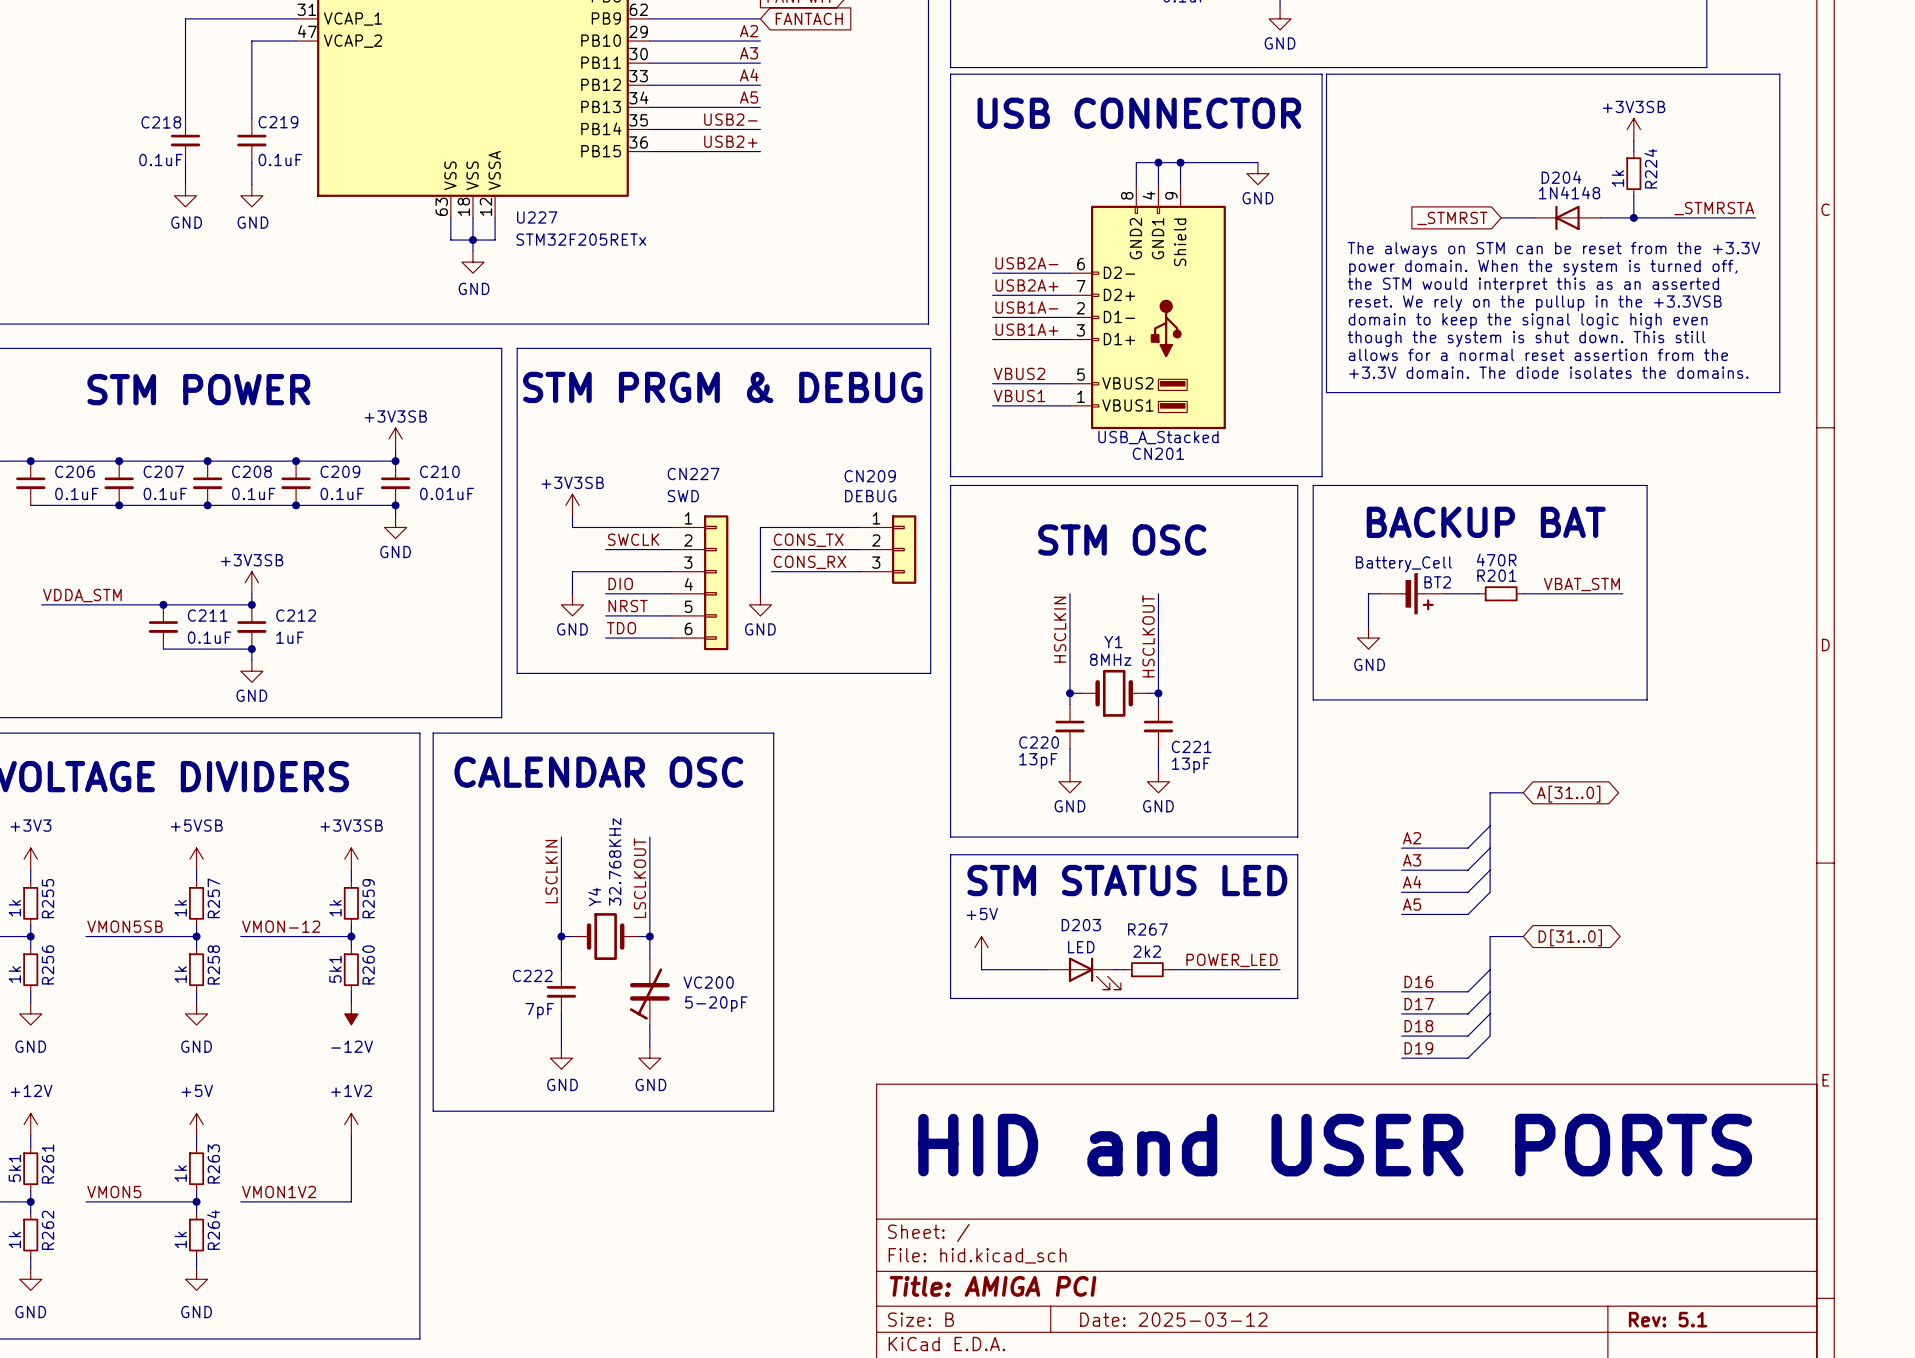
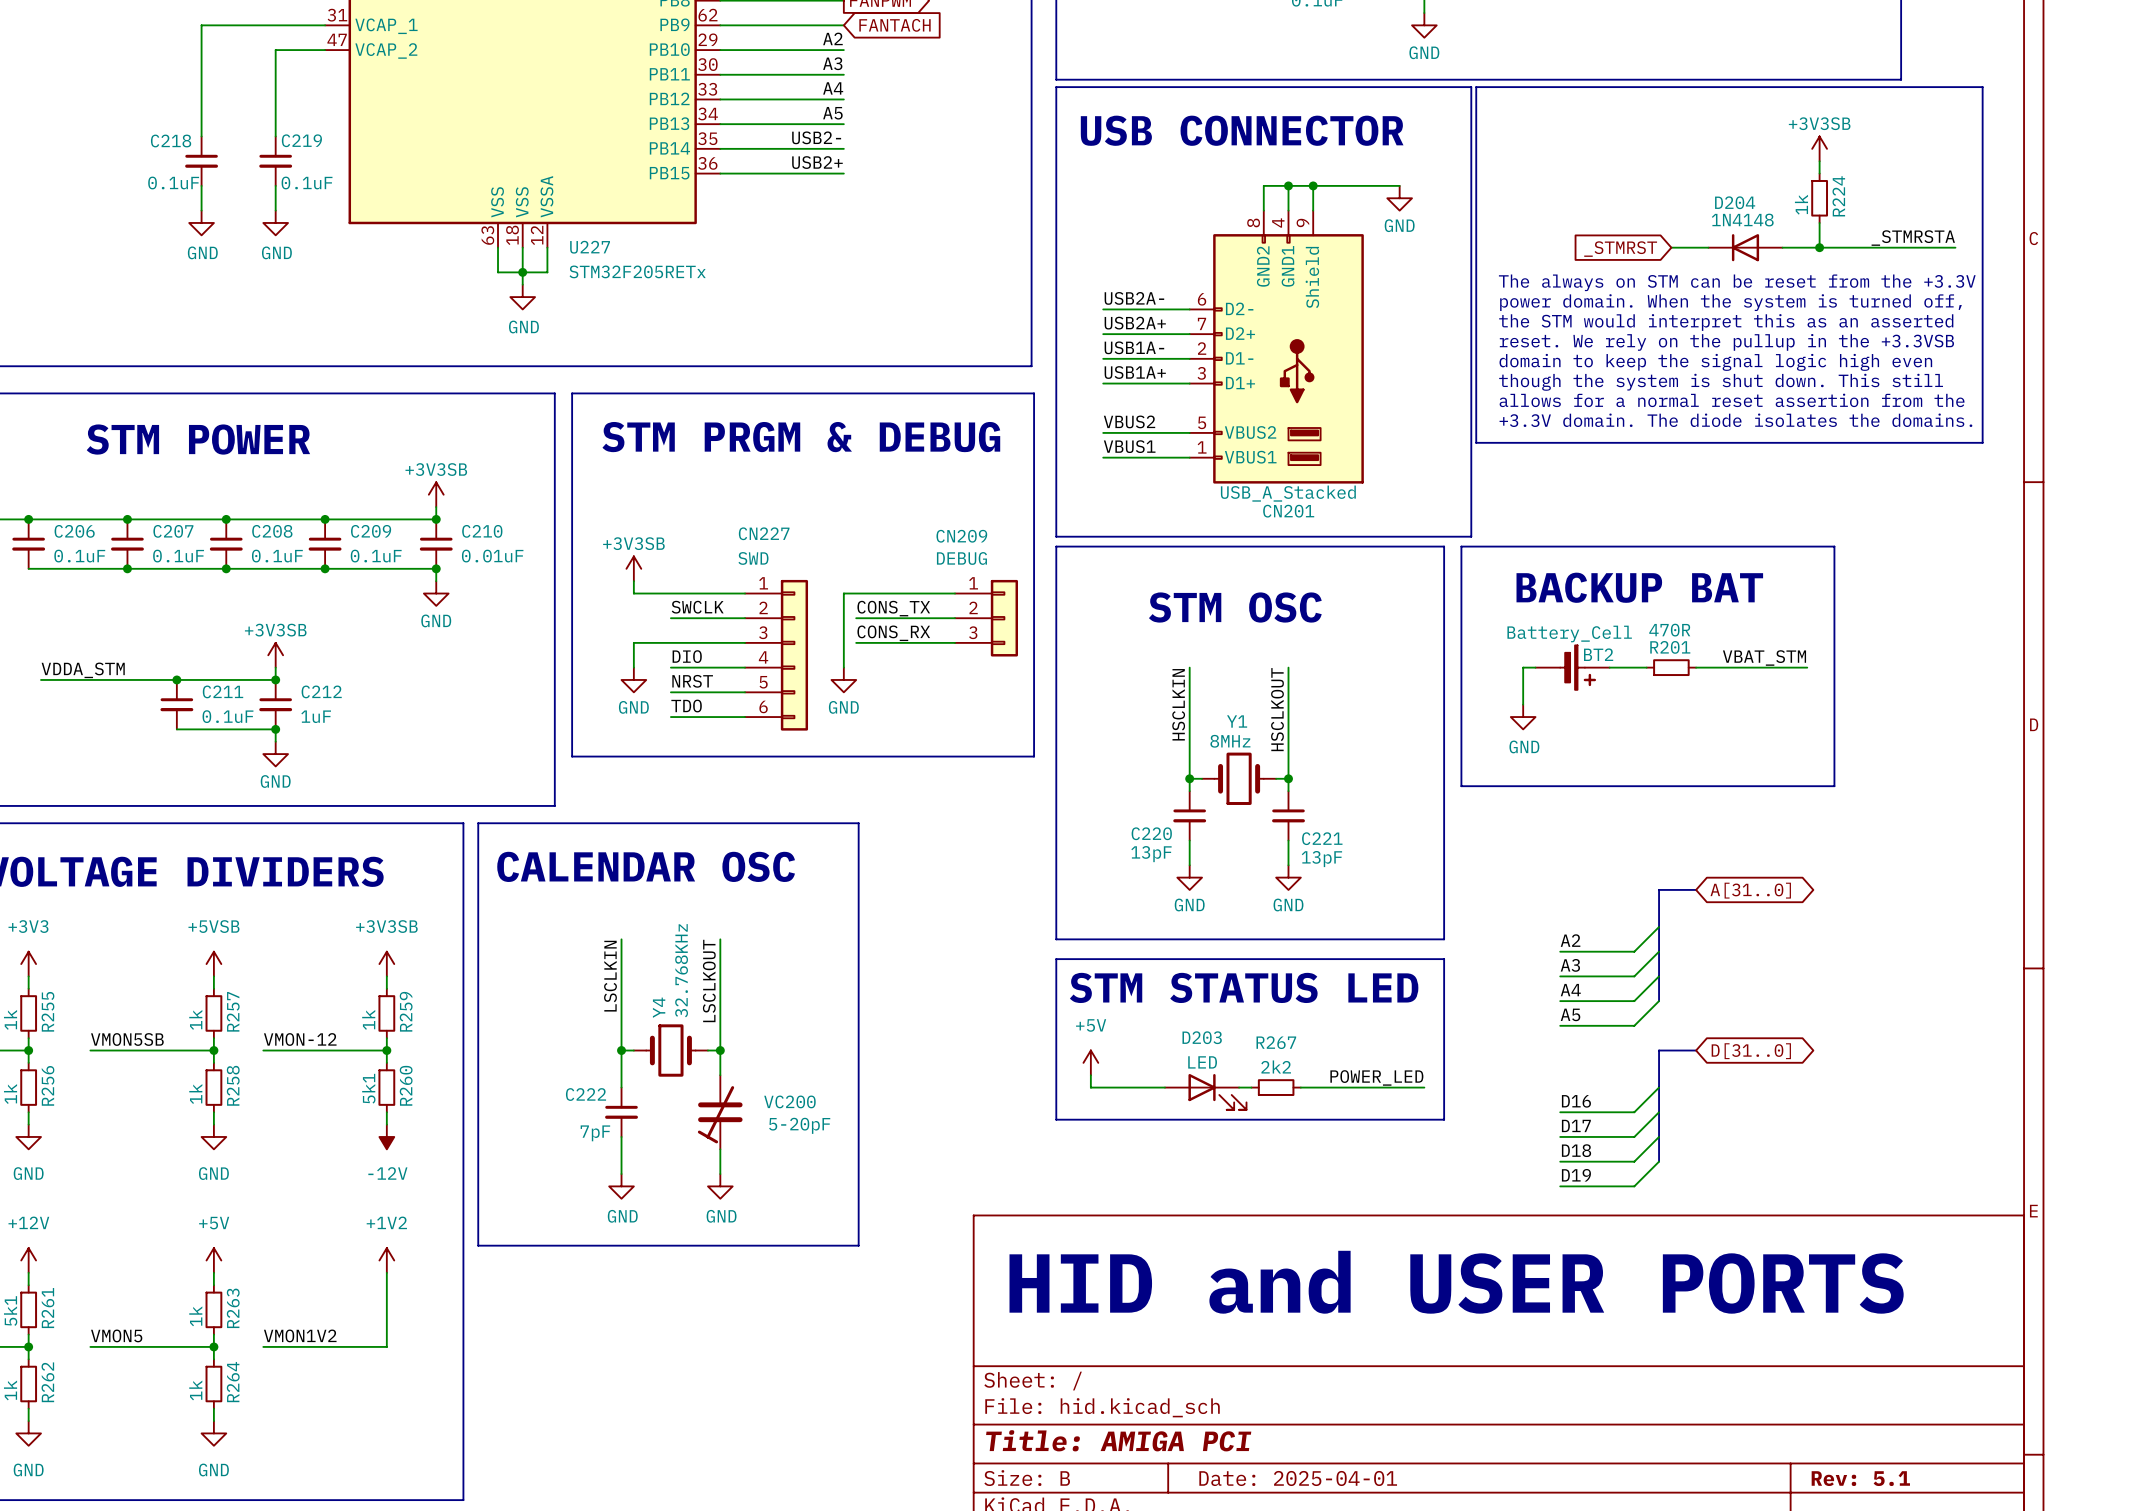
title block: Date: 2025-03-12 (1173, 1319) -> Date: 2025-04-01 (1298, 1478)

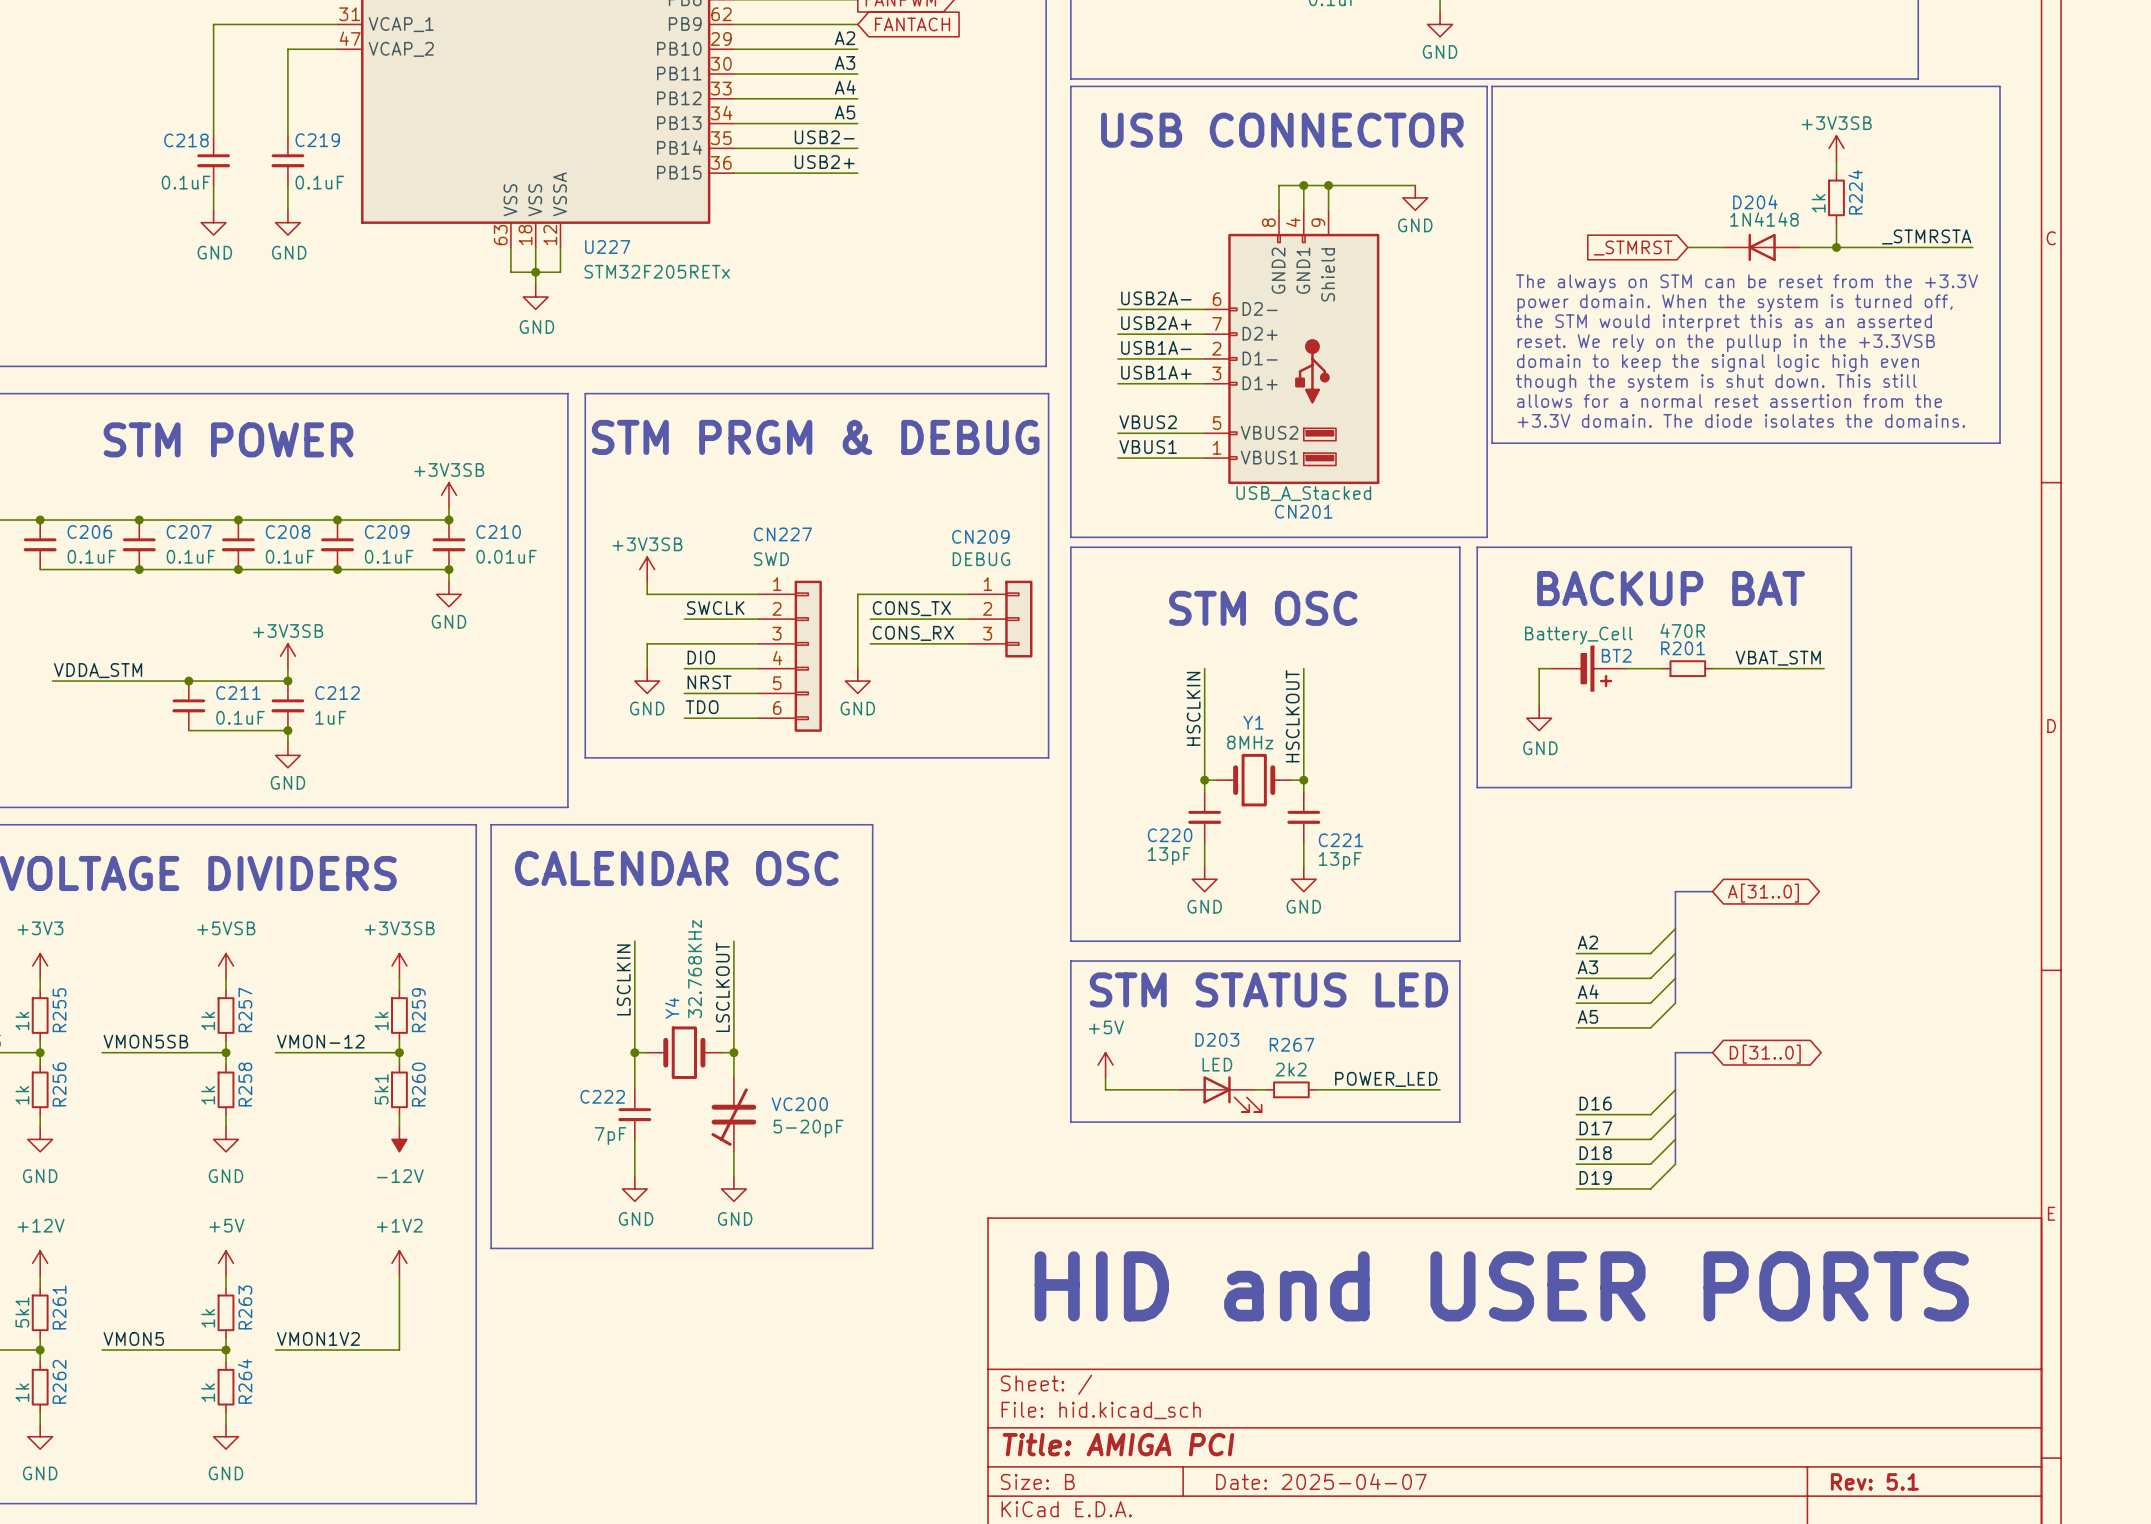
title block: Date: 2025-04-01 (1298, 1478) -> Date: 2025-04-07 (1321, 1481)

